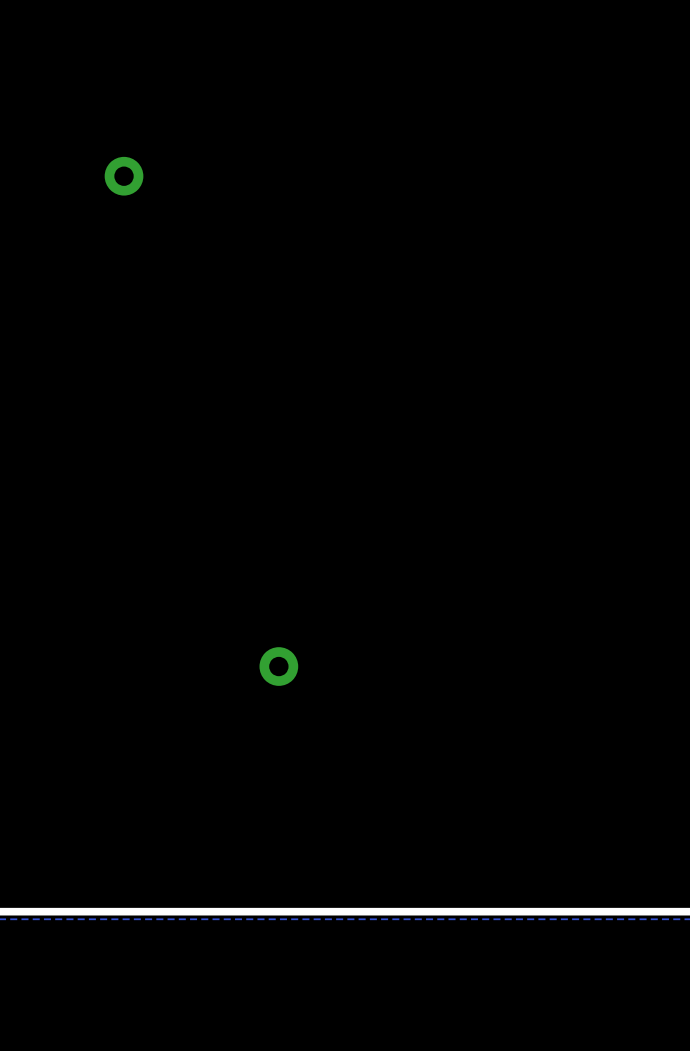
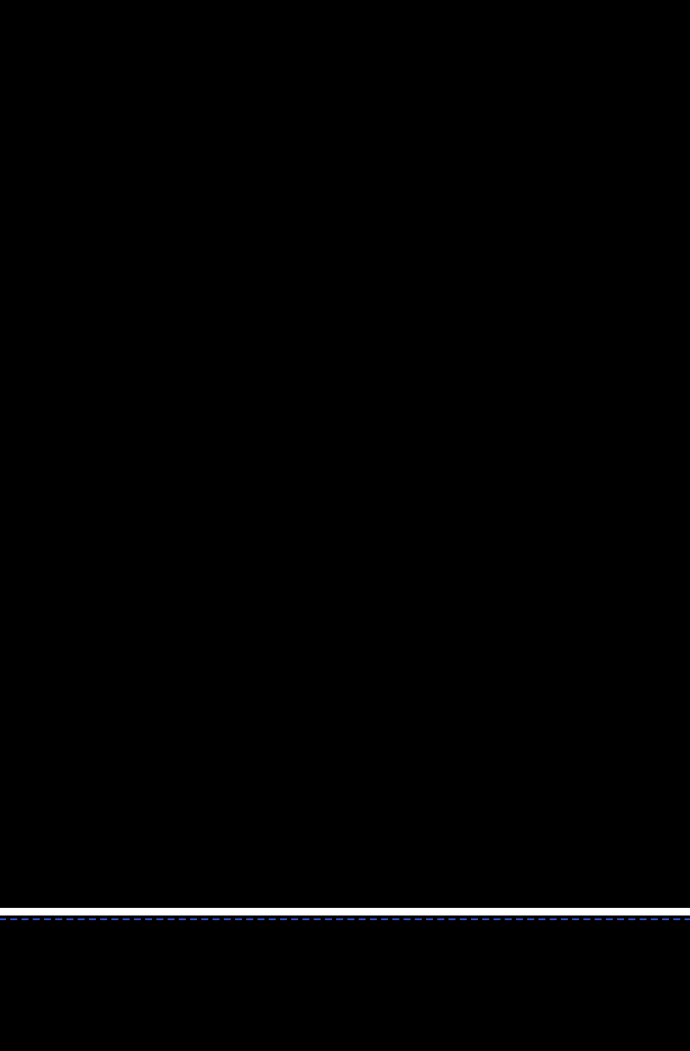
via: (124, 176) -> none
via: (278, 666) -> none

